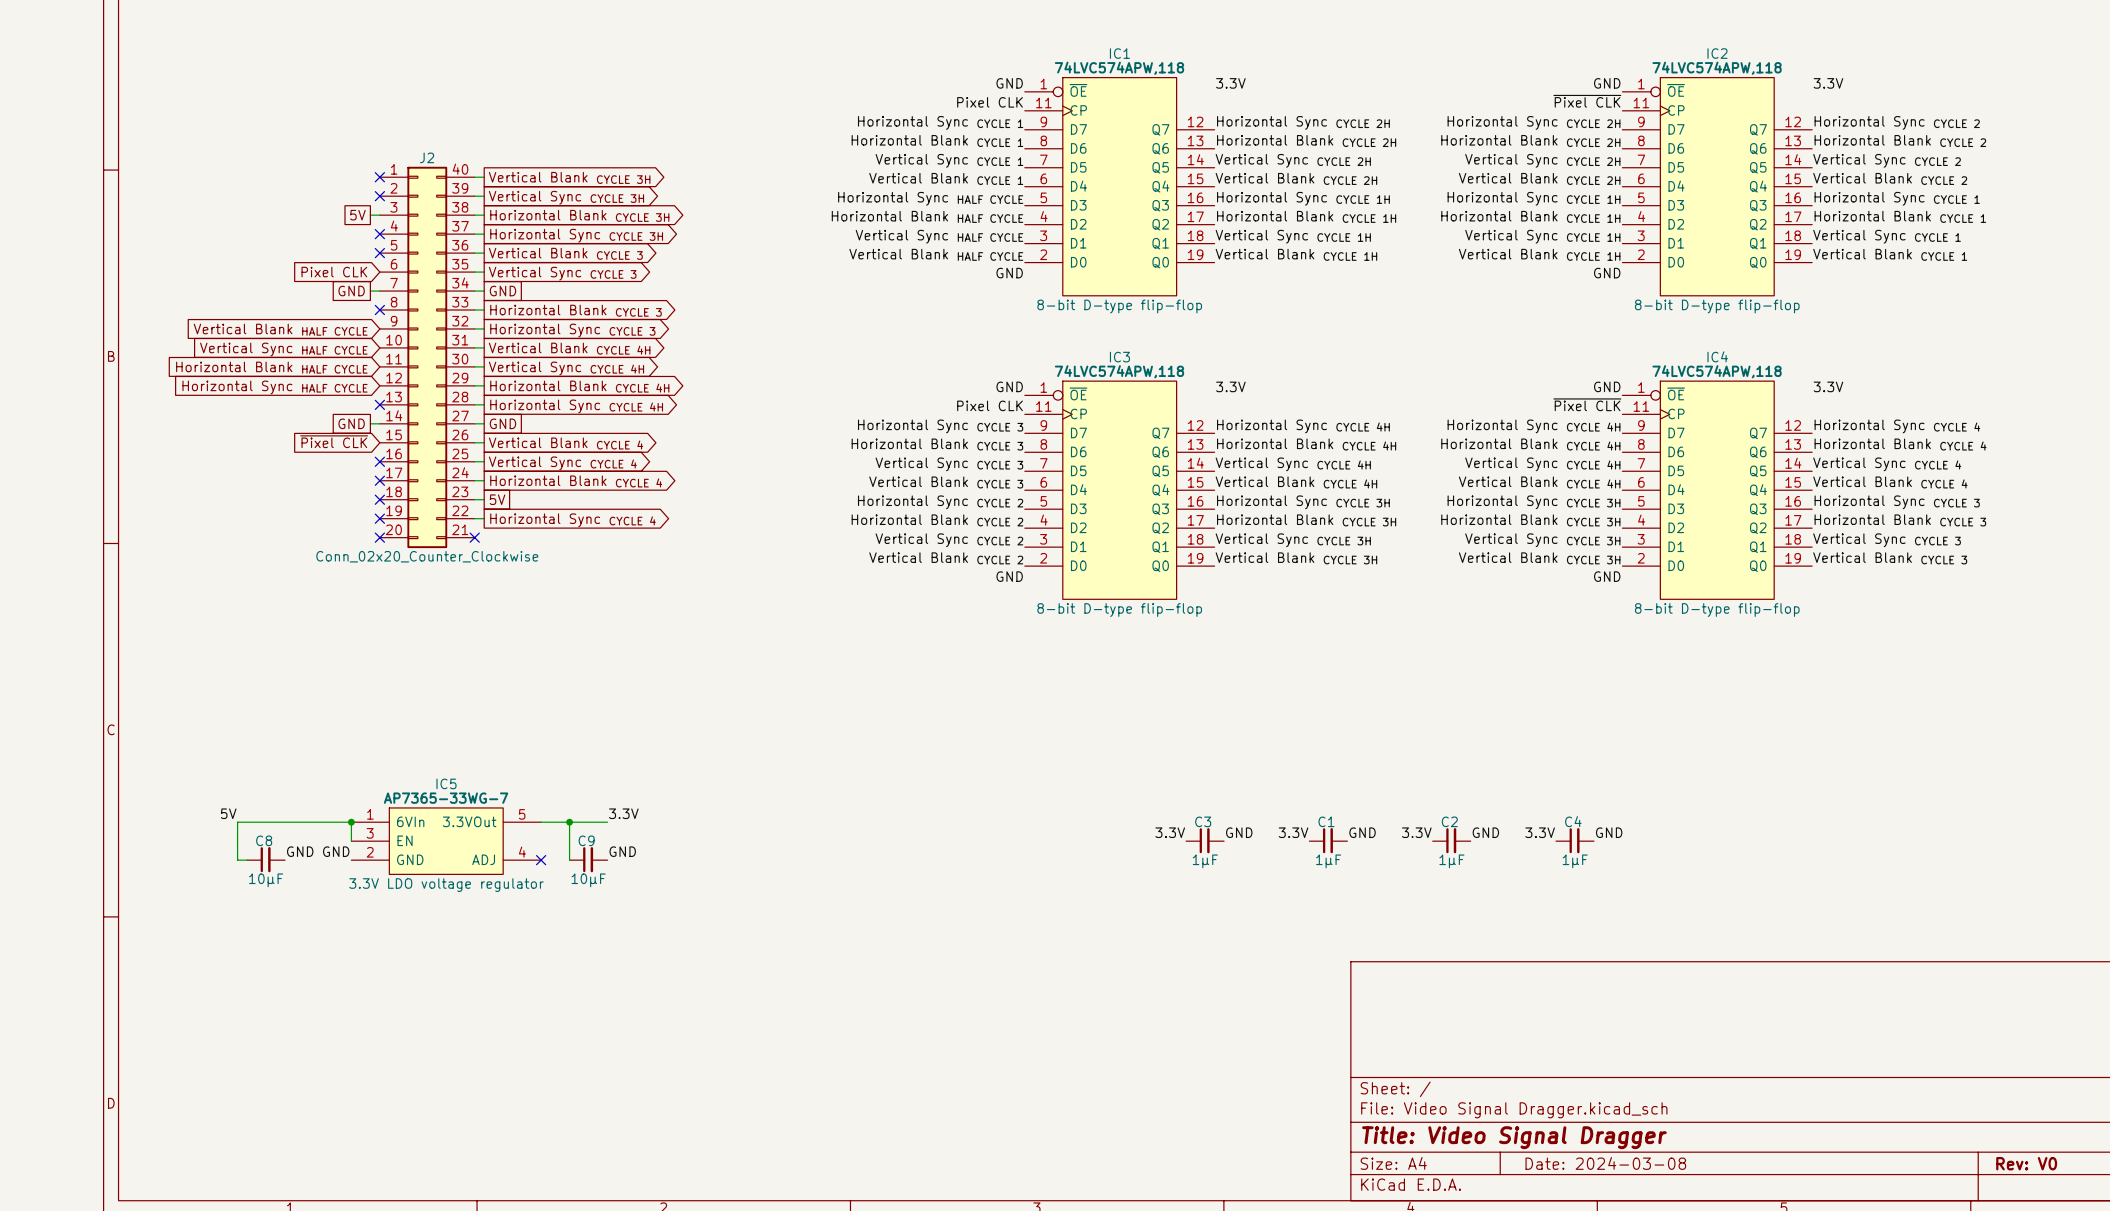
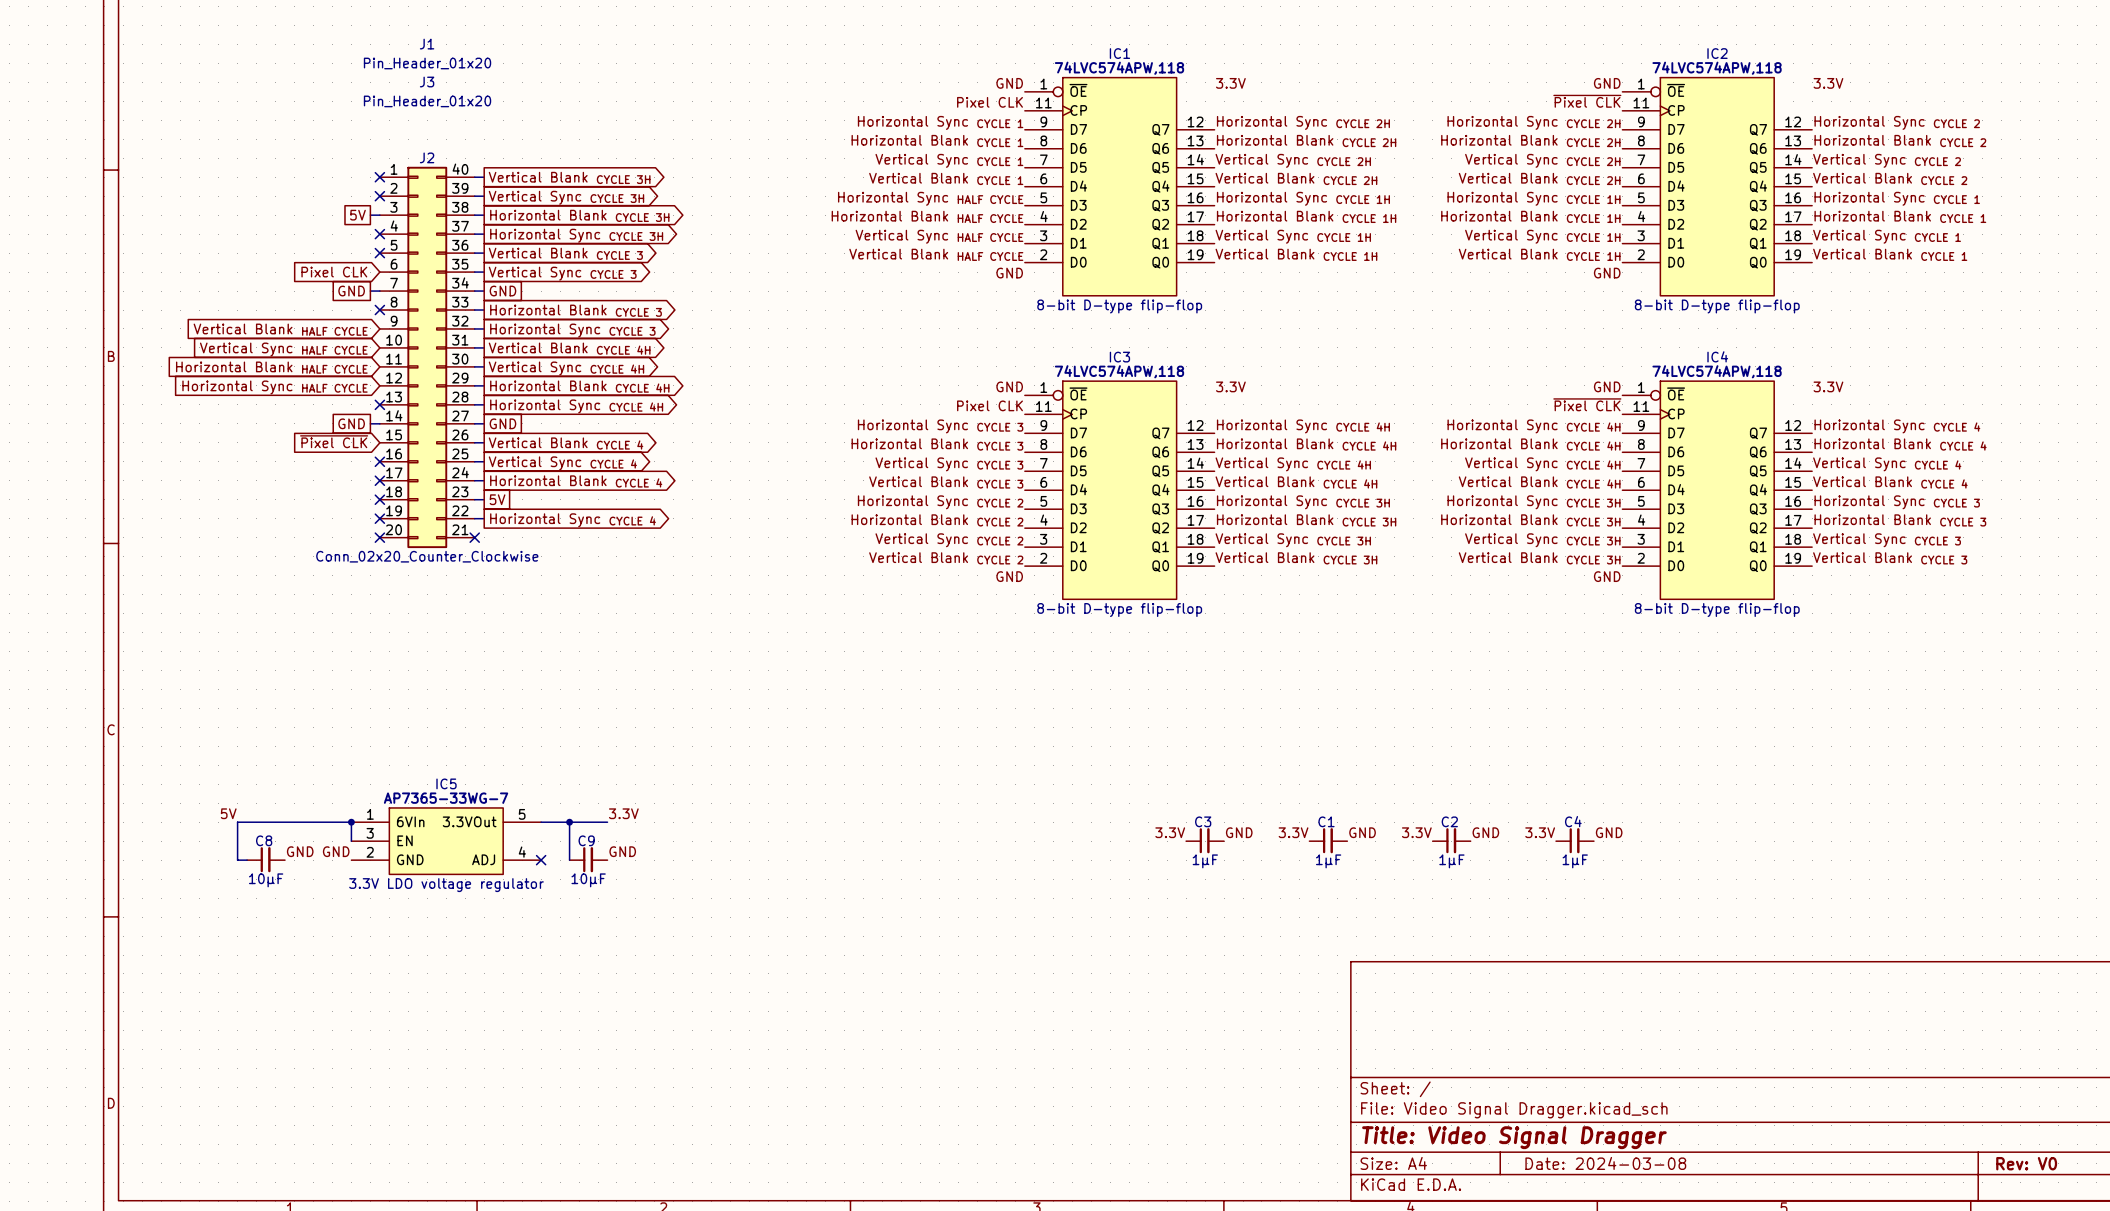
J1: none -> Pin_Header_01x20 (427, 54)
J3: none -> Pin_Header_01x20 (427, 91)

